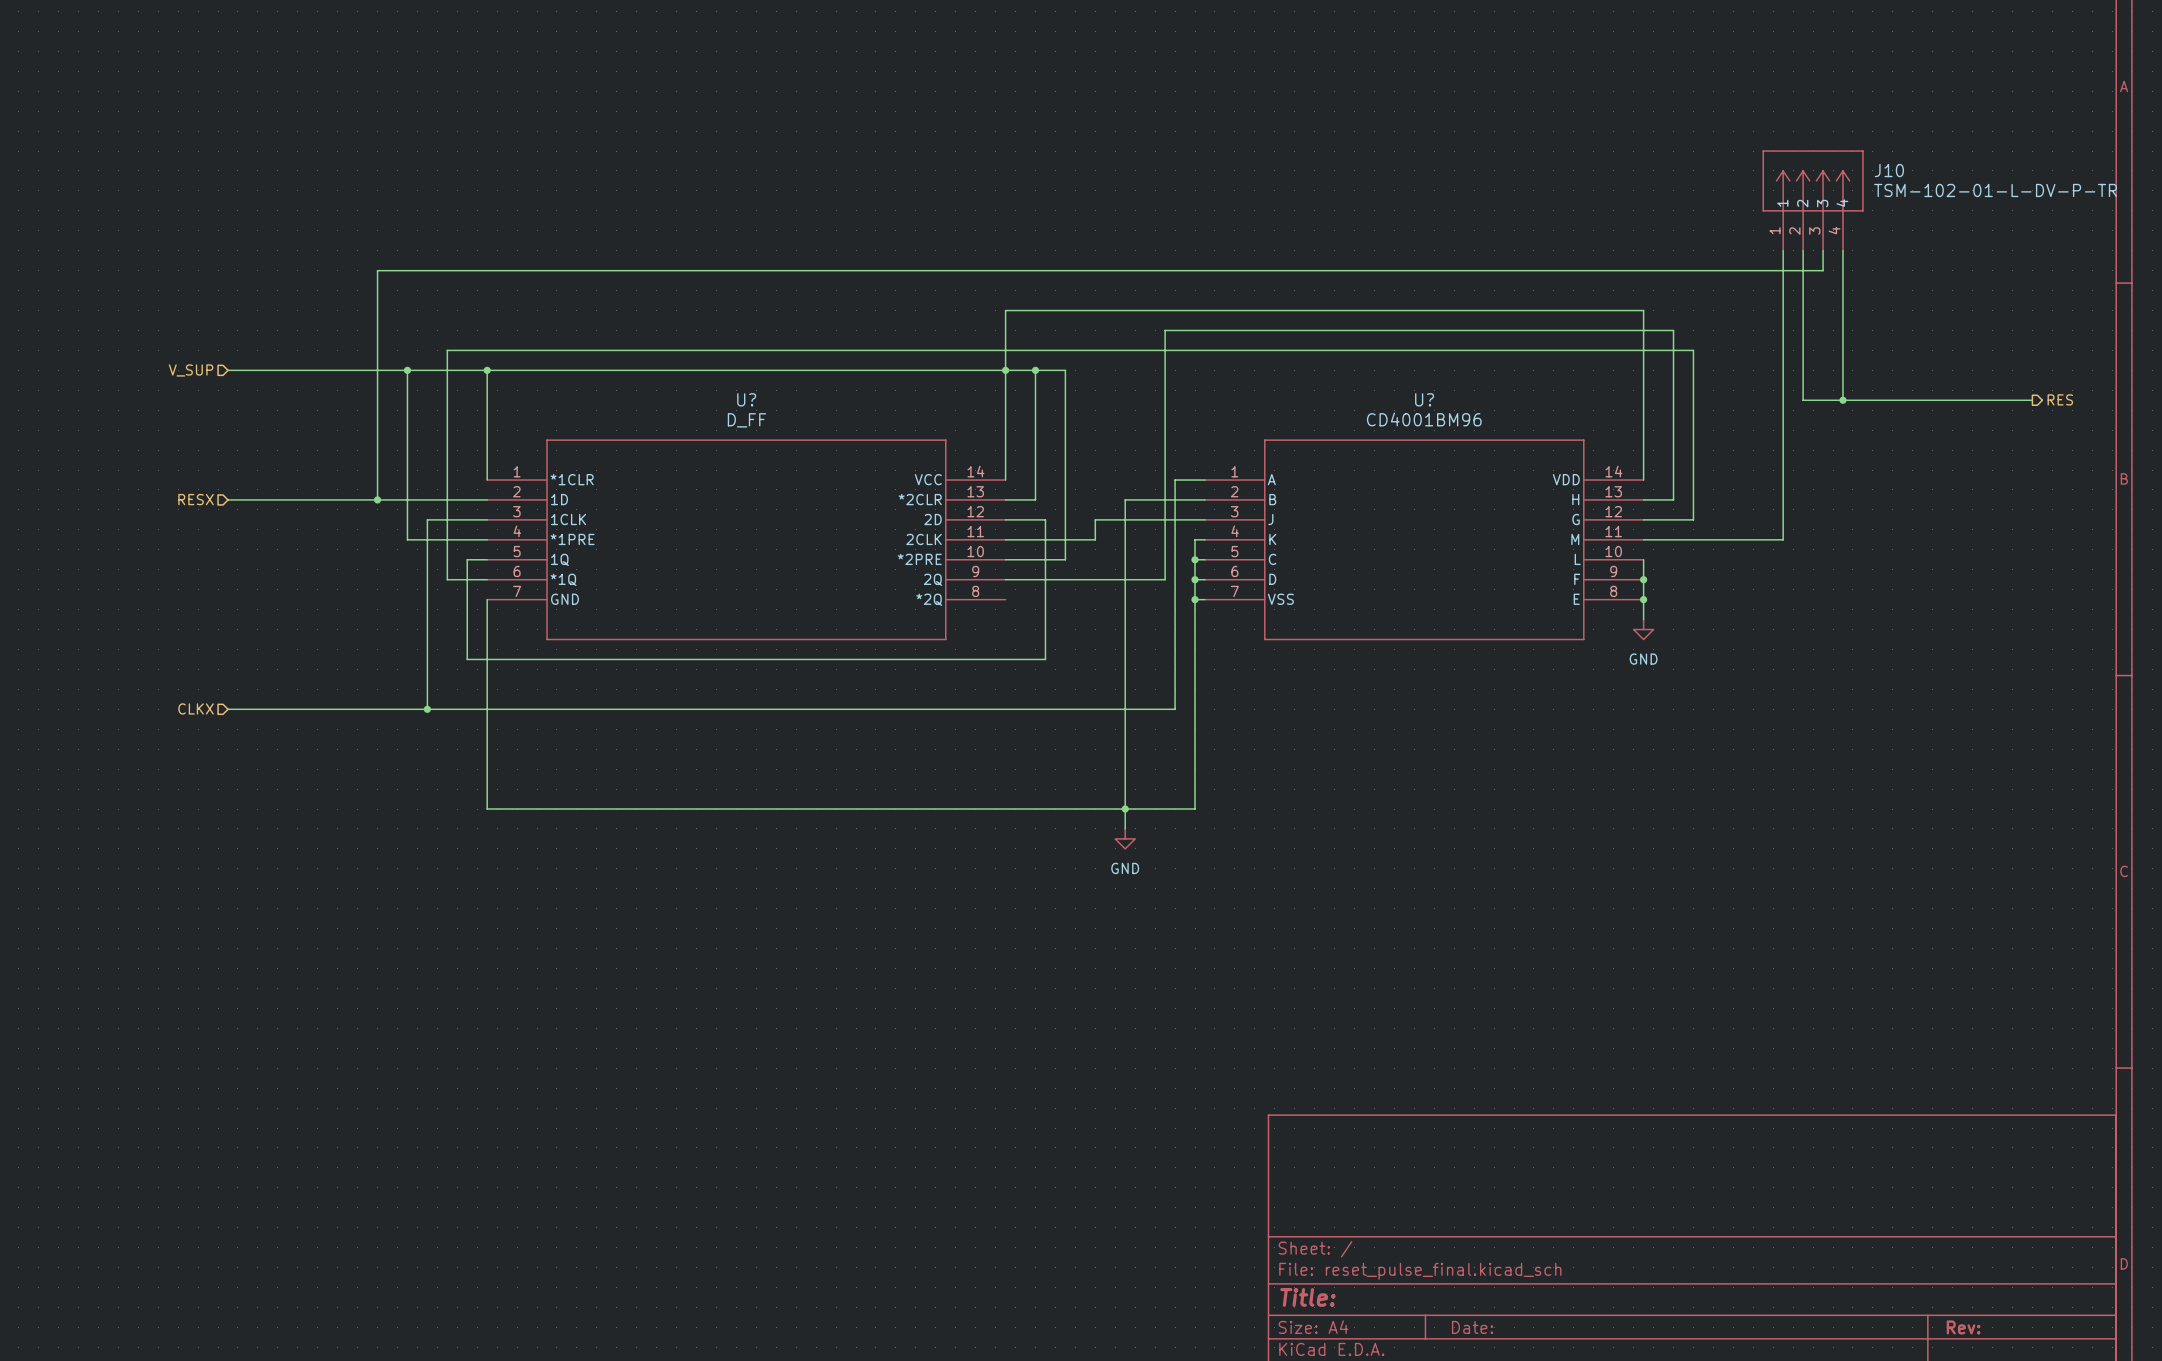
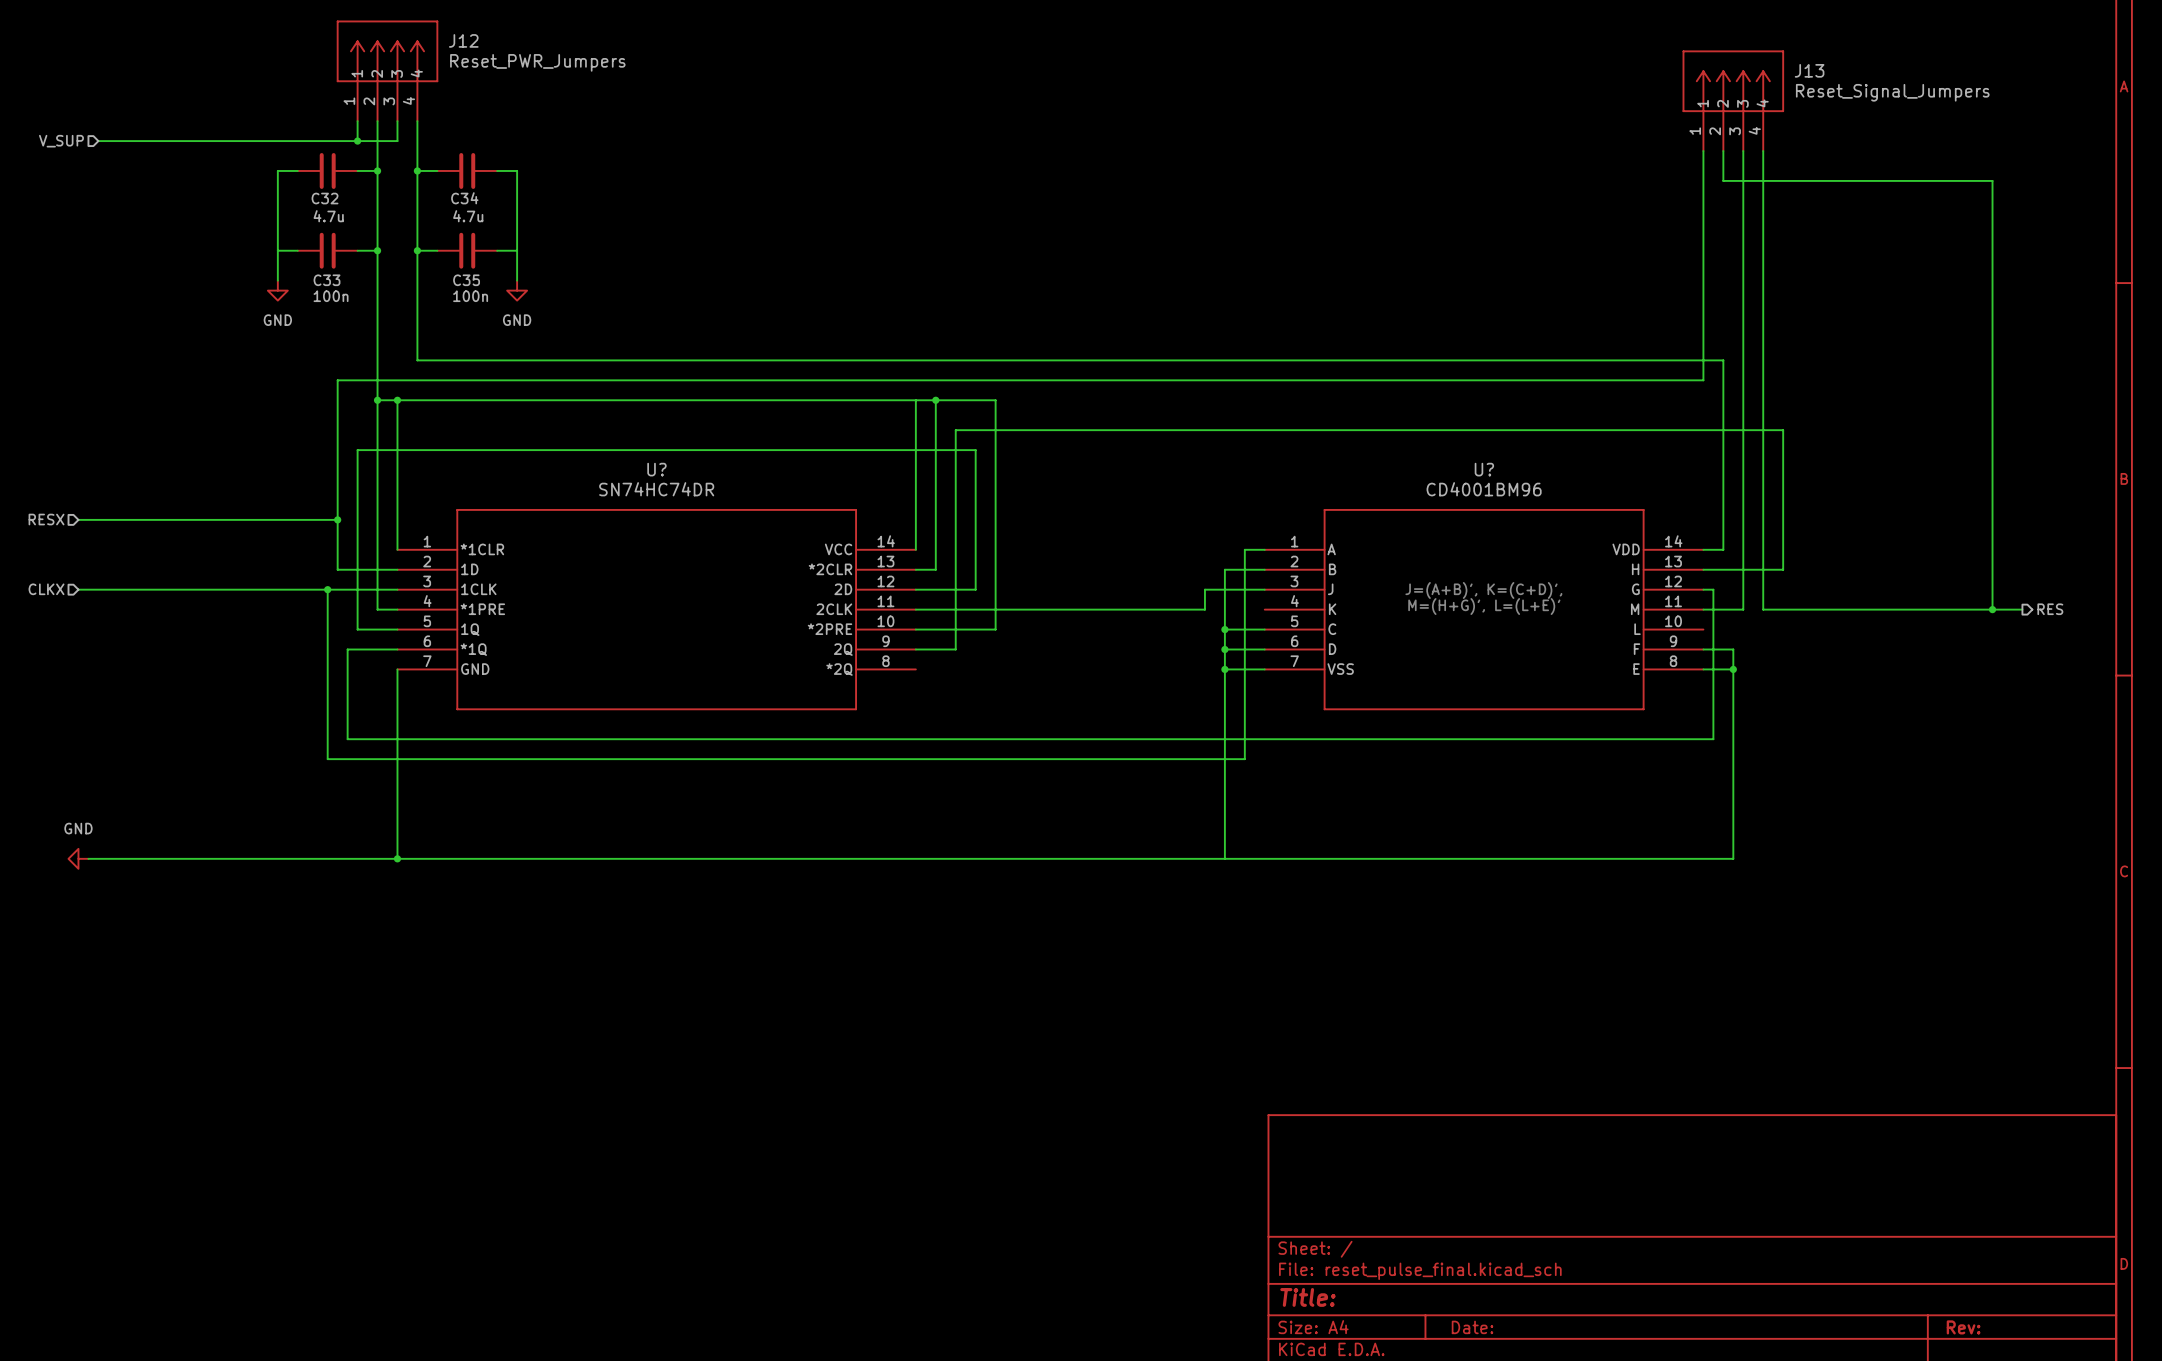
J12: none -> Reset_PWR_Jumpers (387, 71)
J13: none -> Reset_Signal_Jumpers (1733, 100)
wire: none -> (357, 121) (357, 141)
wire: none -> (397, 121) (397, 141) (98, 141)
wire: none -> (417, 121) (417, 360) (1723, 360) (1723, 549) (1703, 549)
hierarchical label: none -> V_SUP (61, 141)
junction: none -> (357, 141)
wire: none -> (1703, 151) (1703, 380) (337, 380) (337, 569) (397, 569)
wire: none -> (1723, 151) (1723, 180) (1992, 180) (1992, 609)
wire: none -> (1743, 151) (1743, 609) (1703, 609)
wire: none -> (1763, 151) (1763, 609) (2022, 609)
wire: none -> (297, 170) (277, 170) (277, 280)
C32: none -> 4.7u (327, 170)
wire: none -> (357, 170) (377, 170)
junction: none -> (377, 170)
wire: none -> (417, 170) (437, 170)
junction: none -> (417, 170)
C34: none -> 4.7u (467, 170)
wire: none -> (497, 170) (517, 170) (517, 280)
J10: TSM-102-01-L-DV-P-TR (1813, 200) -> none
wire: none -> (277, 250) (297, 250)
C33: none -> 100n (327, 250)
wire: none -> (357, 250) (377, 250)
junction: none -> (377, 250)
wire: none -> (417, 250) (437, 250)
junction: none -> (417, 250)
C35: none -> 100n (467, 250)
wire: none -> (497, 250) (517, 250)
wire: (1783, 250) (1783, 430) -> (915, 649) (955, 649) (955, 430) (1783, 430)
wire: (1803, 250) (1803, 400) (2032, 400) -> none
wire: (1823, 250) (1823, 270) (377, 270) -> (377, 121) (377, 270)
wire: (1842, 250) (1842, 400) -> none
power symbol: none -> GND (277, 290)
power symbol: none -> GND (517, 290)
hierarchical label: V_SUP (191, 370) -> none
wire: (228, 370) (1065, 370) (1065, 559) (1005, 559) -> none
wire: (407, 370) (407, 539) (487, 539) -> none
junction: (407, 370) -> none
wire: (487, 370) (487, 480) -> none
junction: (487, 370) -> none
junction: (1005, 370) -> none
wire: (1035, 370) (1035, 499) (1005, 499) -> none
junction: (1035, 370) -> none
hierarchical label: RES (2060, 399) -> none
wire: none -> (377, 400) (995, 400) (995, 629) (915, 629)
junction: none -> (377, 400)
wire: none -> (397, 400) (397, 549)
junction: none -> (397, 400)
wire: none -> (915, 400) (915, 549)
wire: none -> (935, 400) (935, 569) (915, 569)
junction: none -> (935, 400)
junction: (1842, 400) -> none
wire: (1005, 480) (1005, 310) (1643, 310) (1643, 480) -> none
wire: (1204, 480) (1175, 480) (1175, 709) (228, 709) -> none
hierarchical label position: RESX (196, 499) -> RESX (46, 519)
wire: (228, 499) (487, 499) -> (78, 519) (337, 519)
wire: none -> (377, 499) (377, 609) (397, 609)
junction position: (377, 499) -> (337, 519)
wire: (1204, 499) (1125, 499) (1125, 828) -> none
wire: (1643, 499) (1673, 499) (1673, 330) (1165, 330) (1165, 579) (1005, 579) -> none
wire: (487, 519) (427, 519) (427, 709) -> none
wire: (1005, 519) (1045, 519) (1045, 659) (467, 659) (467, 559) (487, 559) -> none
wire: (1204, 519) (1095, 519) (1095, 539) (1005, 539) -> none
wire: (1643, 519) (1693, 519) (1693, 350) (447, 350) (447, 579) (487, 579) -> none
U?: D_FF (746, 539) -> none
wire: (1204, 539) (1195, 539) (1195, 809) (487, 809) (487, 599) -> none
U? position: (1424, 539) -> (1484, 609)
wire: (1643, 539) (1783, 539) -> (1703, 569) (1783, 569) (1783, 539)
wire: none -> (1264, 549) (1244, 549) (1244, 759) (327, 759) (327, 589)
wire: (1195, 559) (1204, 559) -> none
junction: (1195, 559) -> none
wire: none -> (1264, 569) (1224, 569) (1224, 858)
wire: (1195, 579) (1204, 579) -> none
junction: (1195, 579) -> none
junction: (1643, 579) -> none
wire: none -> (78, 589) (397, 589)
junction: none -> (327, 589)
wire: none -> (915, 589) (975, 589) (975, 450) (357, 450) (357, 629) (397, 629)
wire: none -> (1264, 589) (1204, 589) (1204, 609) (915, 609)
wire: none -> (1703, 589) (1713, 589) (1713, 739) (347, 739) (347, 649) (397, 649)
text: none -> J=(A+B)', K=(C+D)', (1483, 590)
wire: (1195, 599) (1204, 599) -> none
junction: (1195, 599) -> none
junction: (1643, 599) -> none
text: none -> M=(H+G)', L=(L+E)' (1484, 606)
U?: none -> SN74HC74DR (656, 609)
junction: none -> (1992, 609)
hierarchical label: none -> RES (2050, 609)
wire: none -> (1224, 629) (1264, 629)
junction: none -> (1224, 629)
power symbol: GND (1643, 629) -> none
wire: none -> (1224, 649) (1264, 649)
junction: none -> (1224, 649)
wire: none -> (1703, 649) (1733, 649) (1733, 858) (88, 858)
wire: none -> (397, 669) (397, 858)
wire: none -> (1224, 669) (1264, 669)
junction: none -> (1224, 669)
wire: none -> (1703, 669) (1733, 669)
junction: none -> (1733, 669)
hierarchical label position: CLKX (196, 708) -> CLKX (46, 589)
junction: (427, 709) -> none
junction: (1125, 809) -> none
power symbol: GND (1125, 838) -> none
power symbol: none -> GND (78, 858)
junction: none -> (397, 858)

